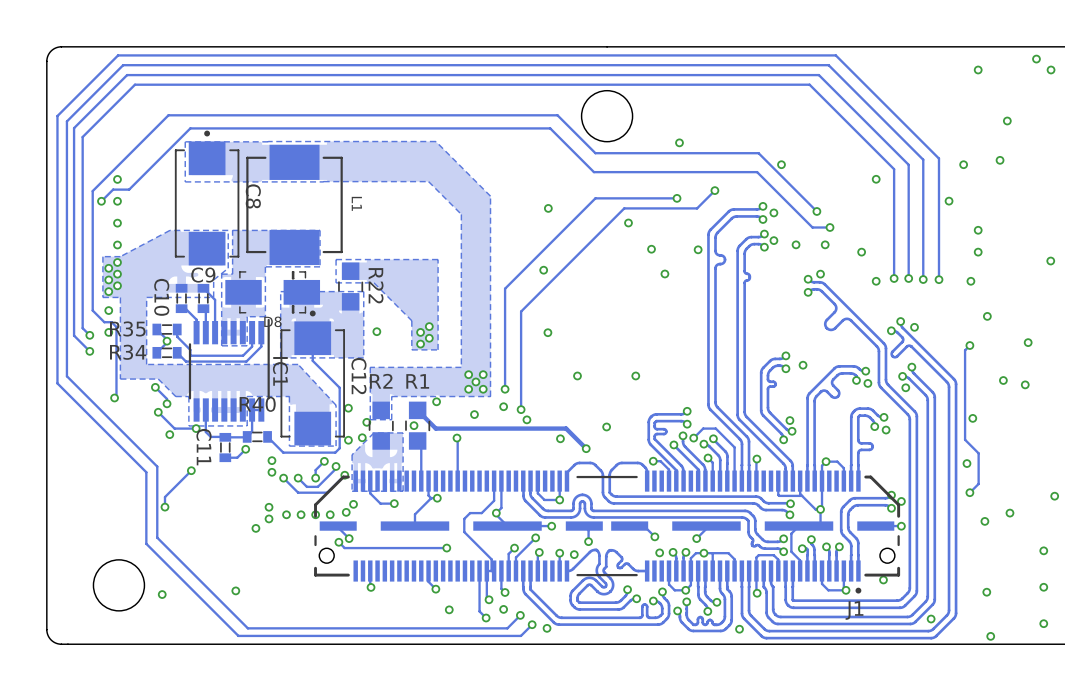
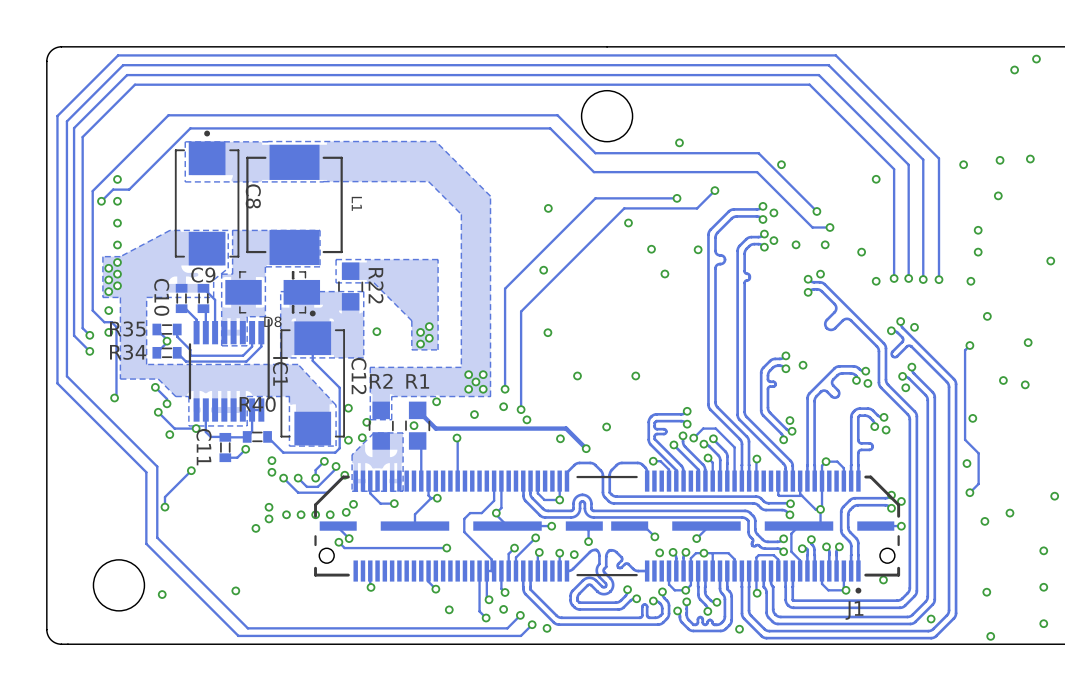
via: (978, 69) -> none
via: none -> (1014, 69)
via: (1051, 69) -> none
via: (1007, 120) -> none
via: none -> (1030, 159)
via: none -> (998, 195)
via: (949, 201) -> none

